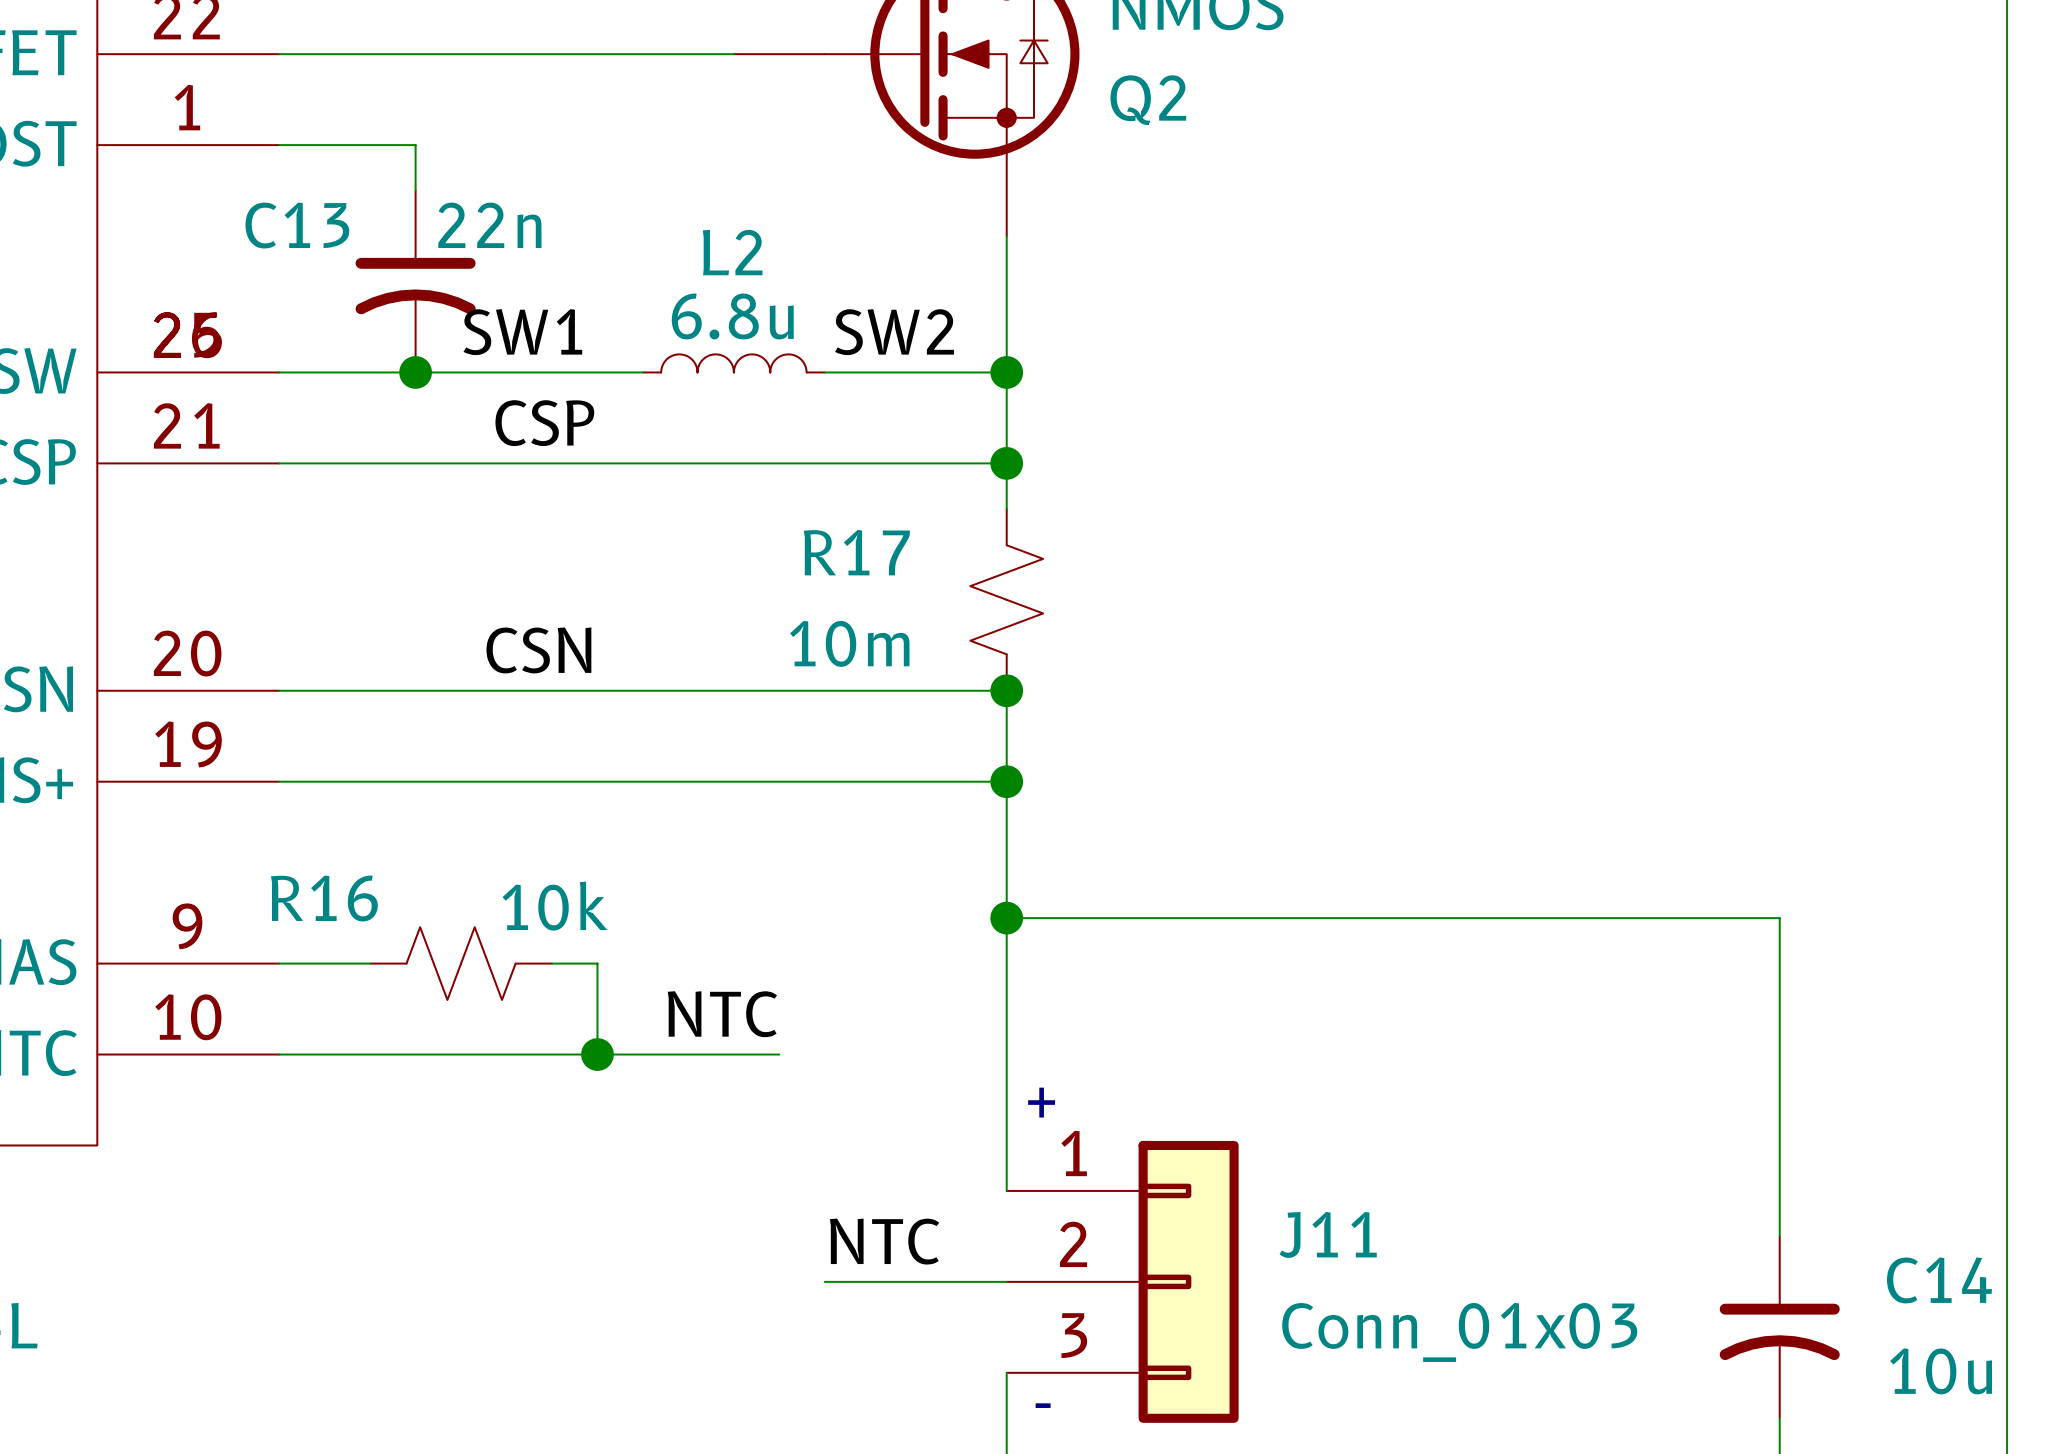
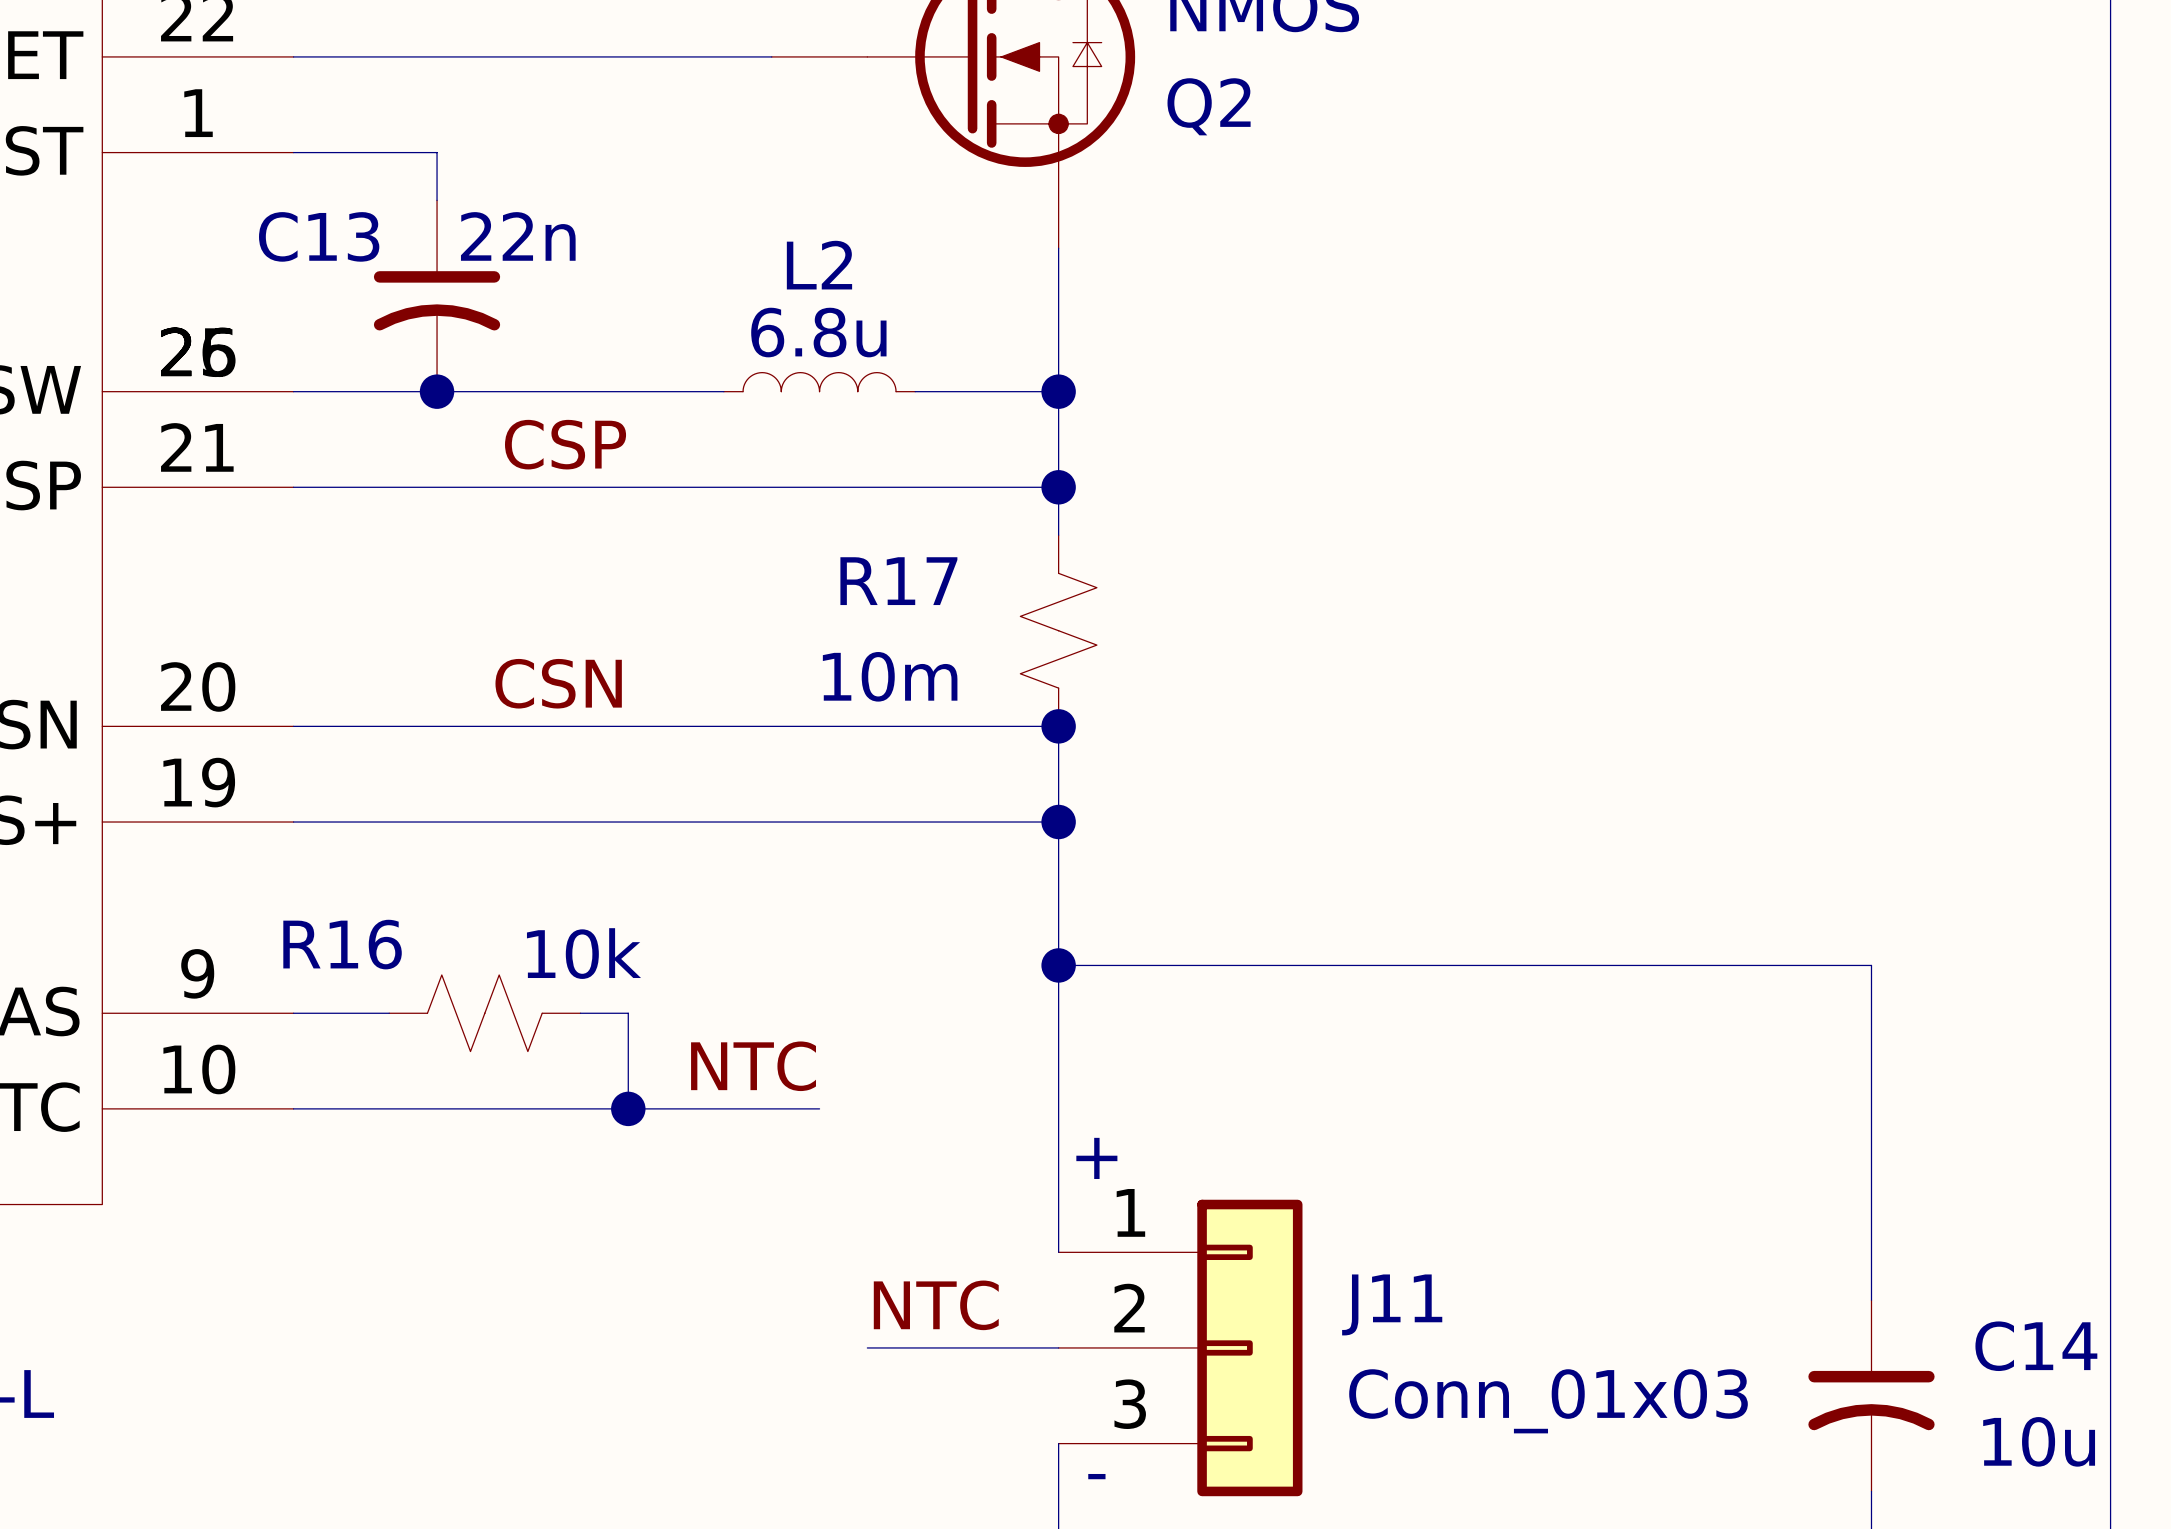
label: SW1 (522, 332) -> none
label: SW2 (894, 332) -> none
L2 position: (733, 363) -> (819, 382)
wire: (824, 372) (870, 372) -> (676, 391) (723, 391)

